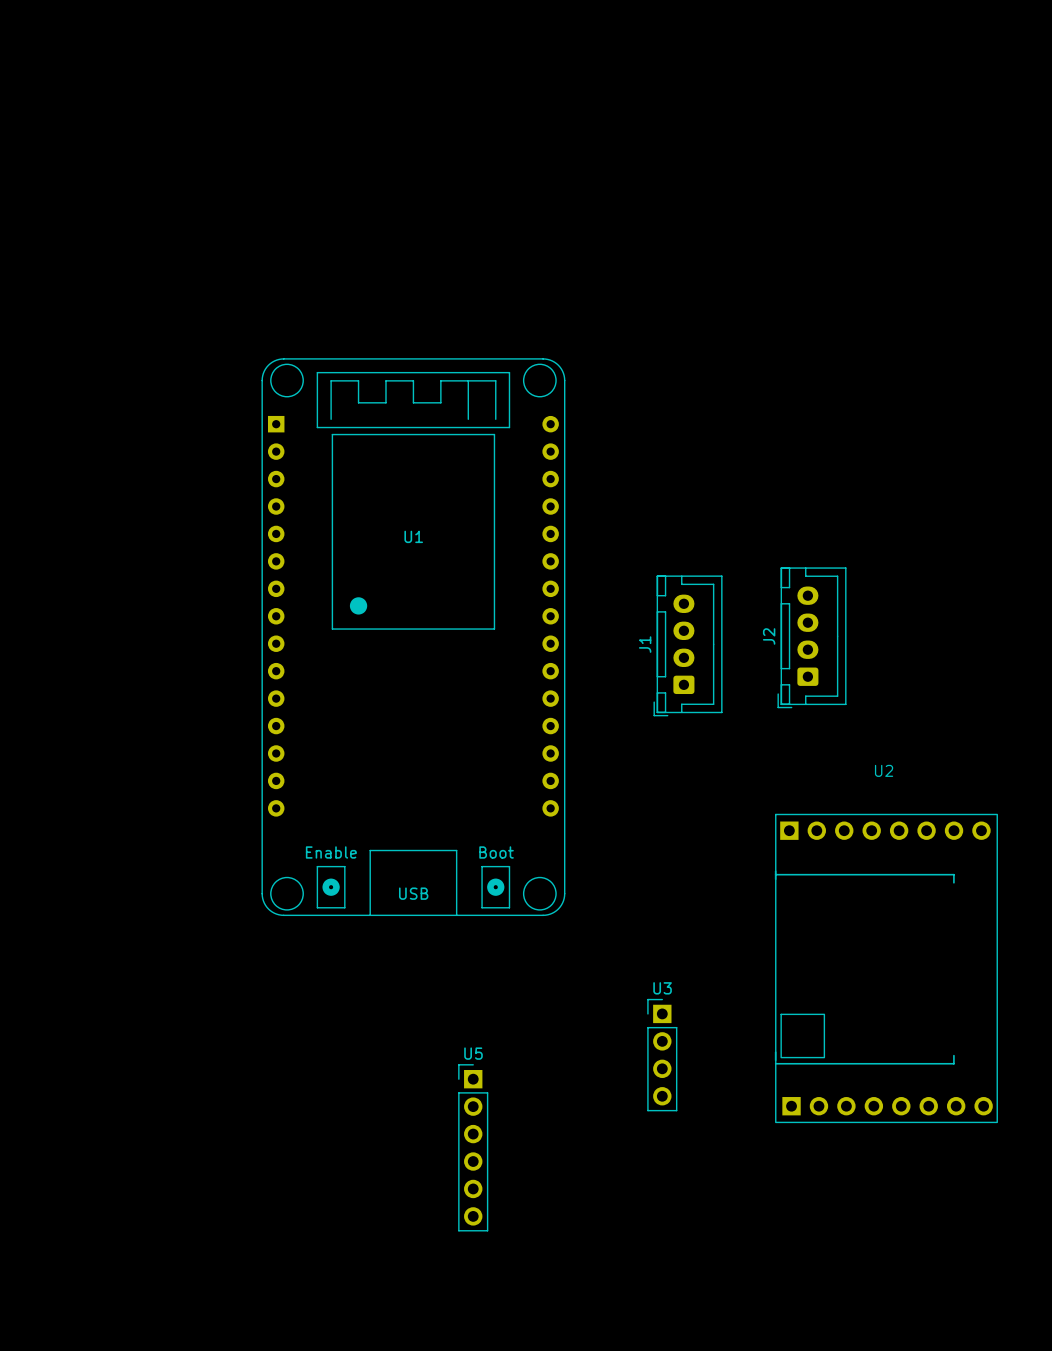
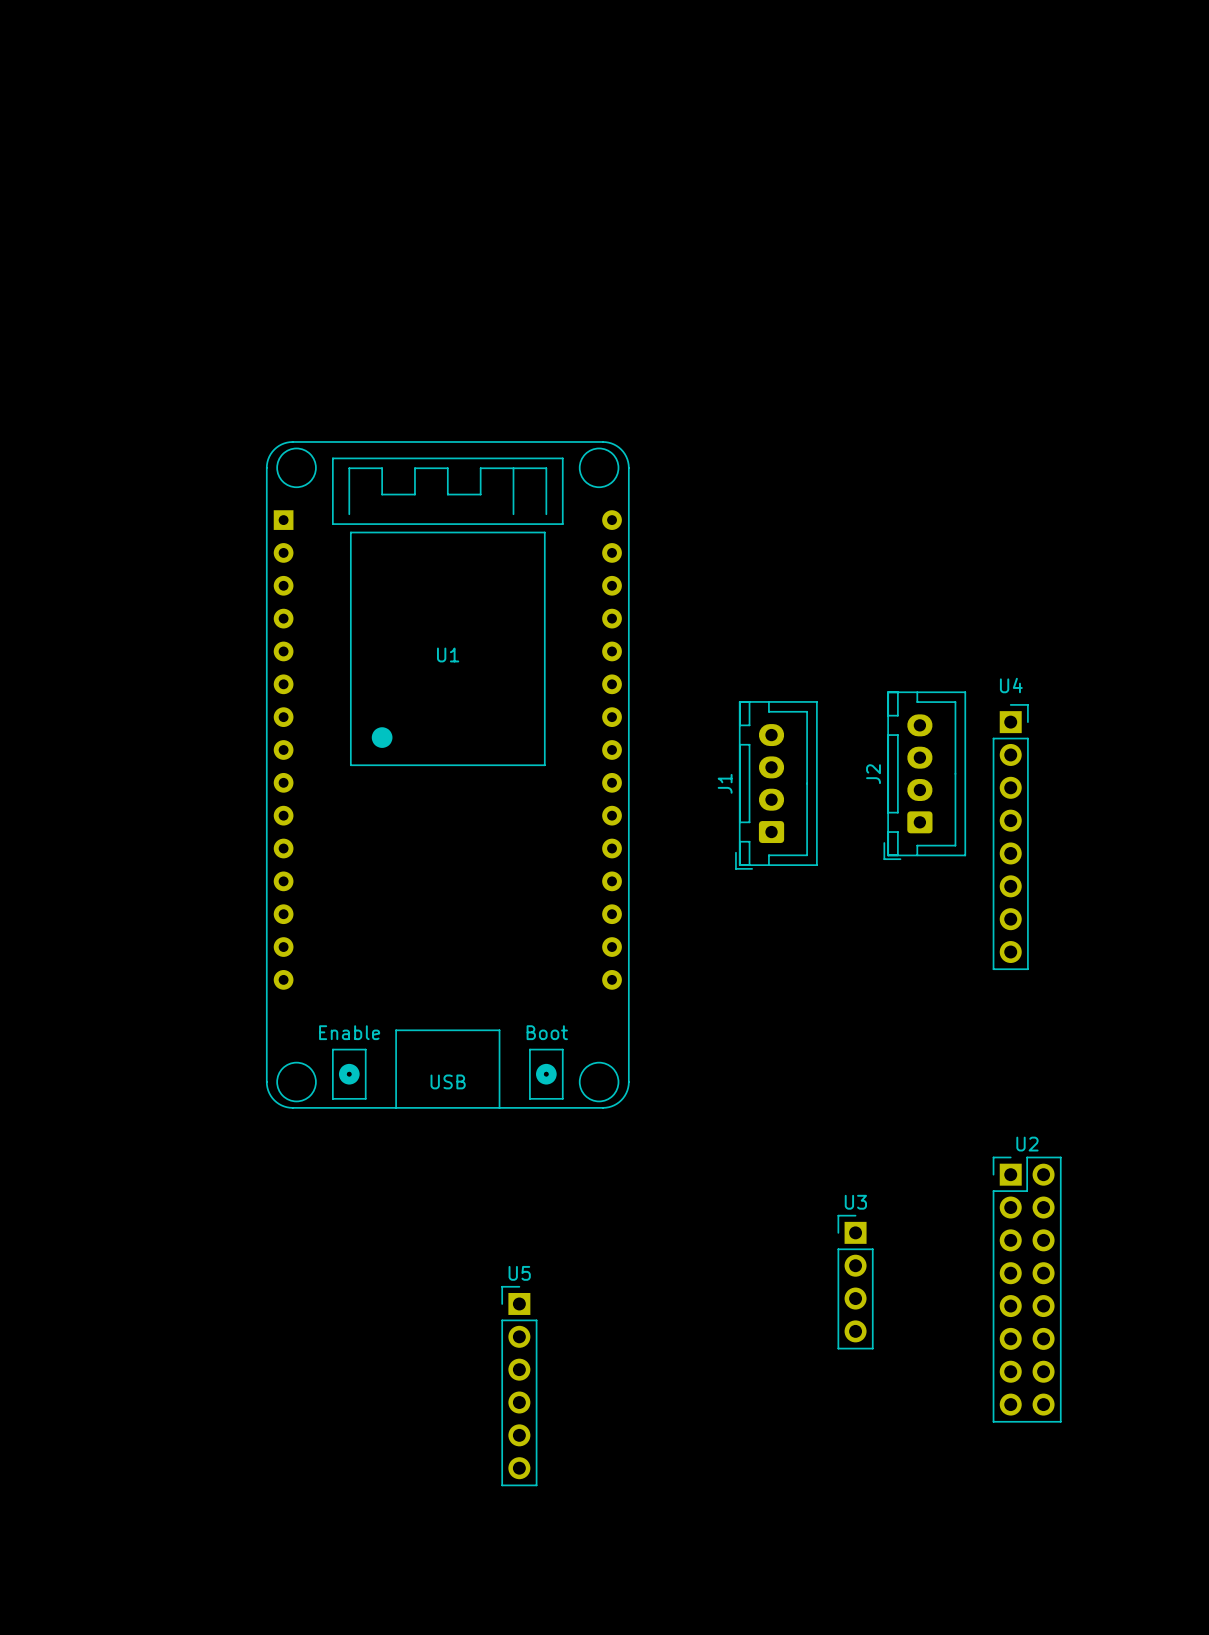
U4: none -> (1010, 837)
U2 name position: U2 (884, 770) -> U2 (1027, 1144)
U2 footprint: [774, 813, 998, 1123] -> [992, 1156, 1062, 1423]
U3 position: (662, 1055) -> (855, 1282)

